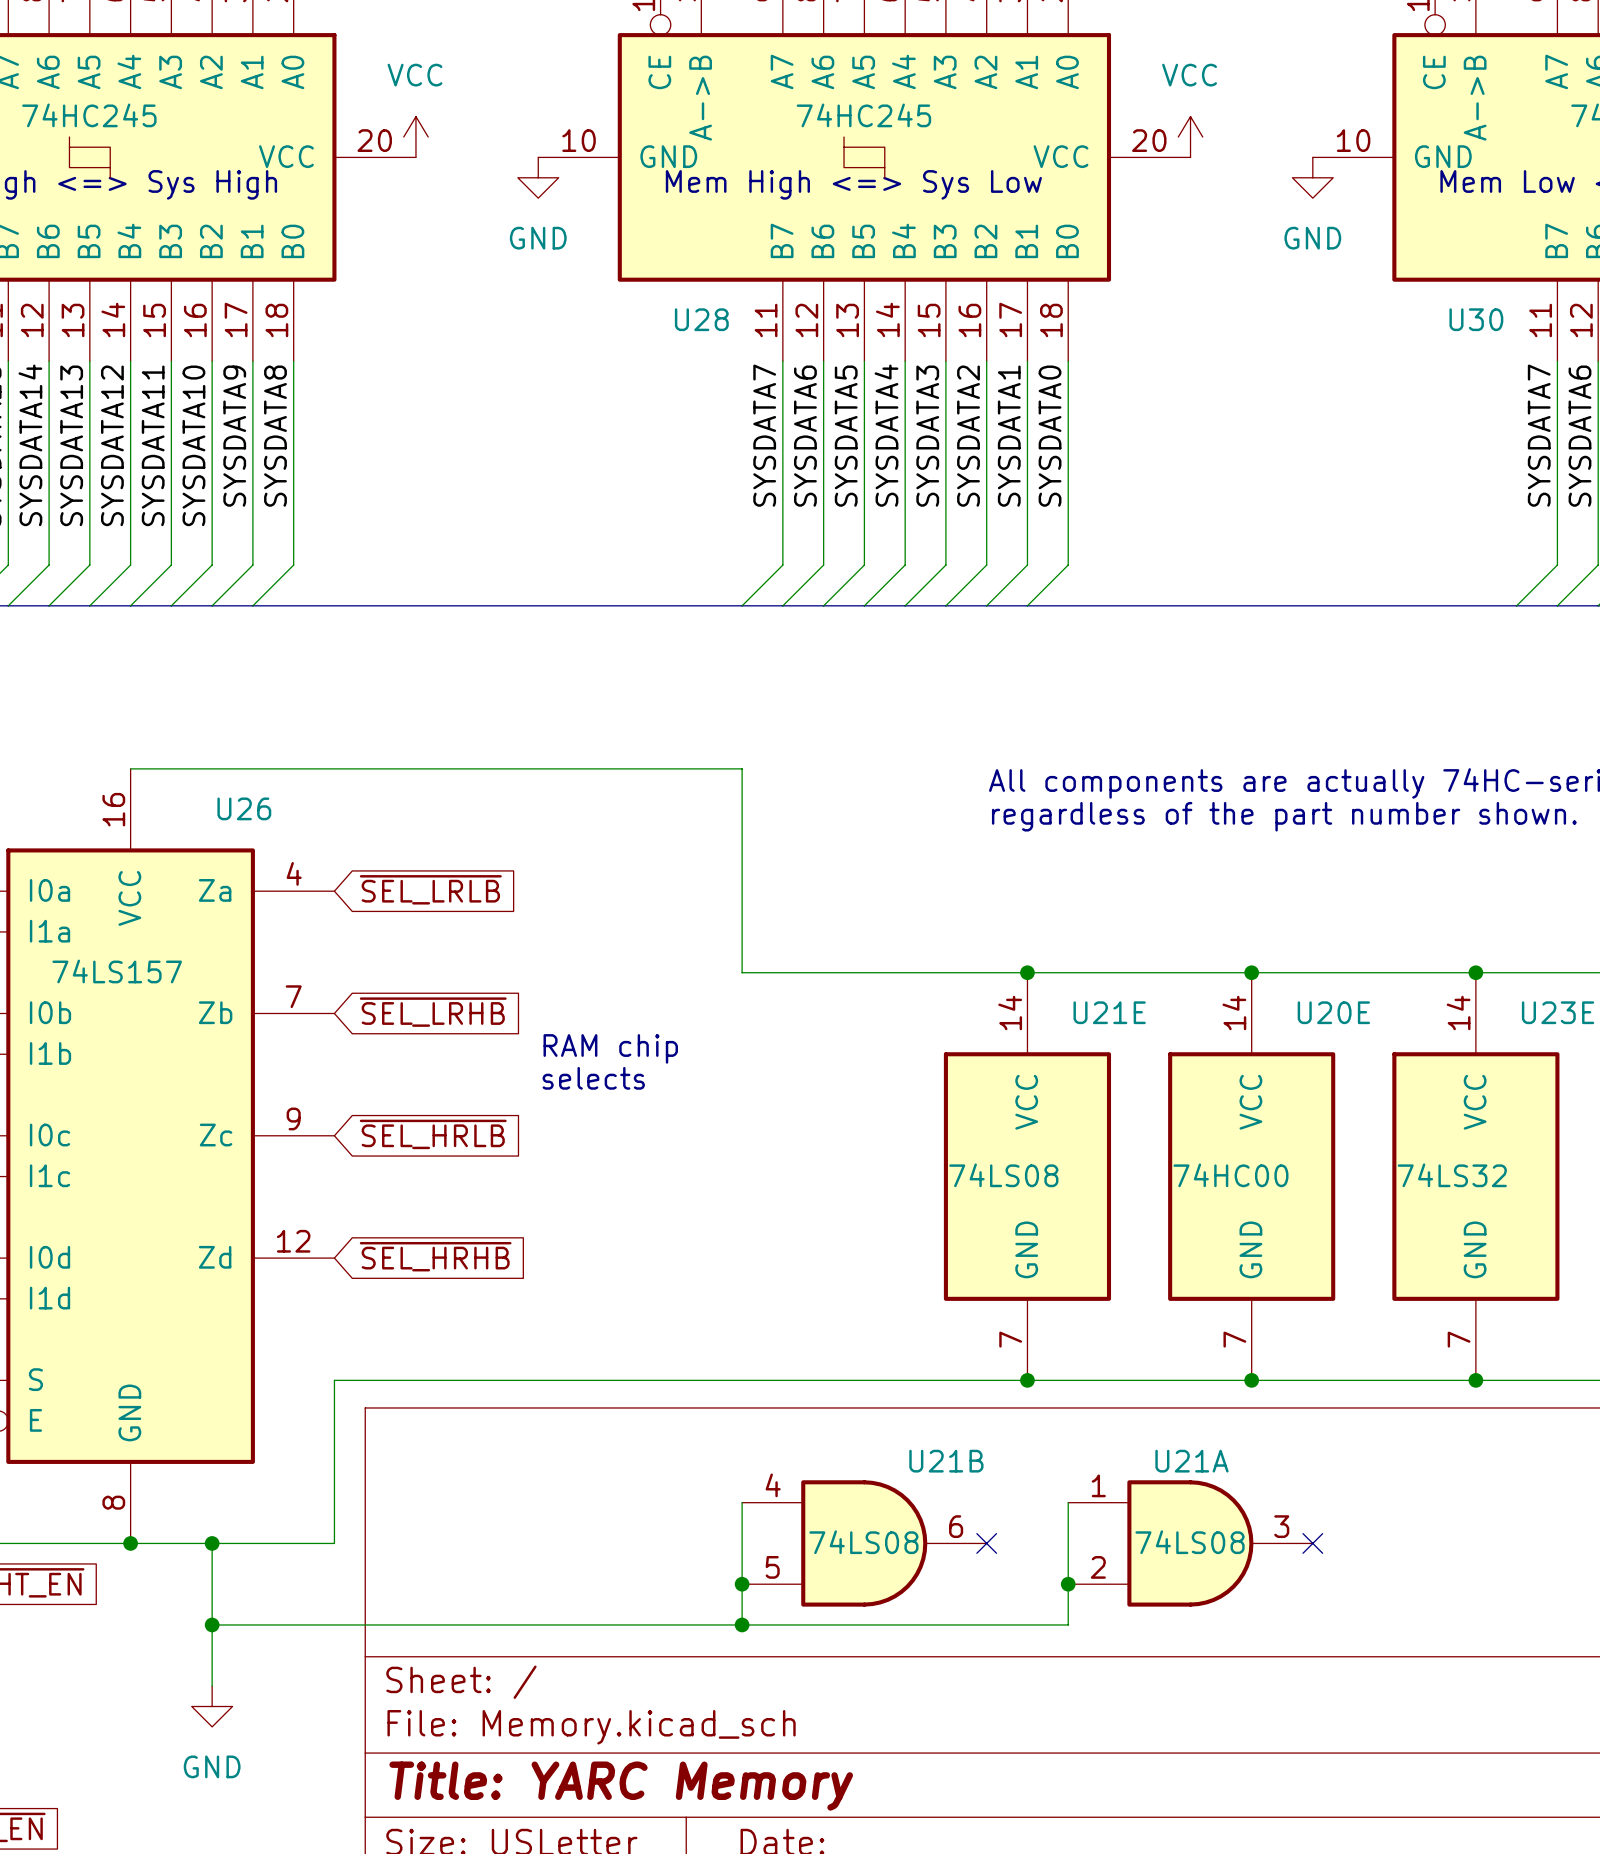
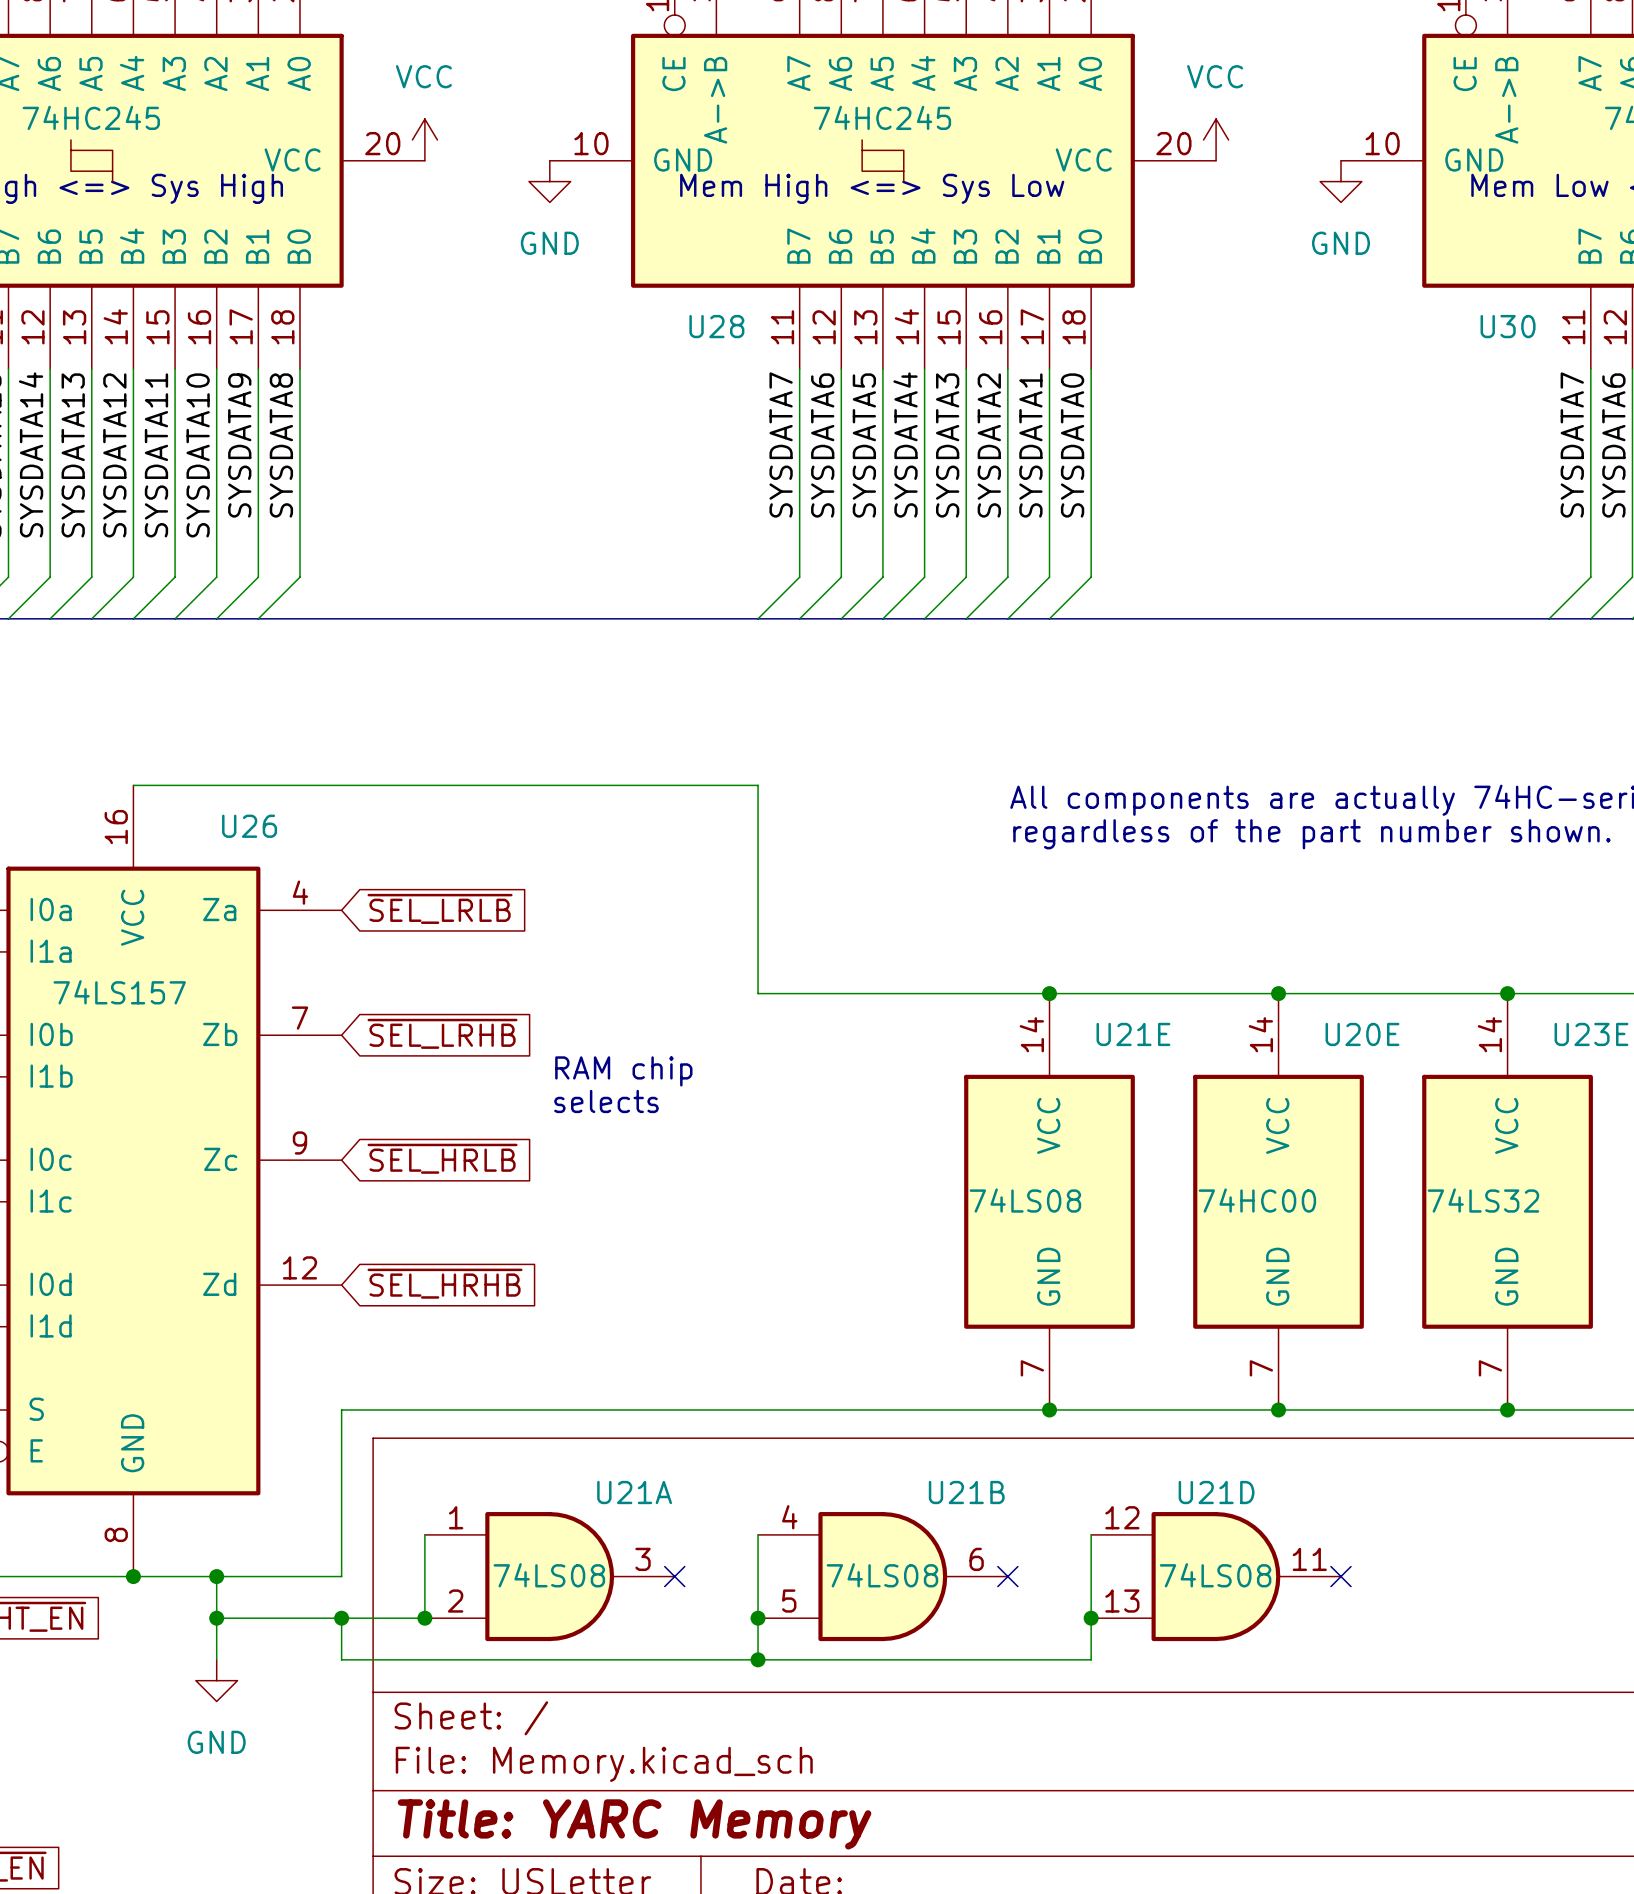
U21A name position: U21A (1191, 1461) -> U21A (634, 1492)
wire: none -> (424, 1534) (424, 1618) (216, 1618)
no-connect mark: none -> (674, 1576)
U21A position: (1190, 1543) -> (549, 1576)
U21D: none -> 74LS08 (1216, 1576)
junction: none -> (341, 1618)
junction: none -> (424, 1618)
junction position: (212, 1624) -> (216, 1618)
wire: (334, 1624) (212, 1624) (212, 1686) -> (341, 1659) (341, 1618)
power symbol position: GND (212, 1706) -> GND (216, 1680)

